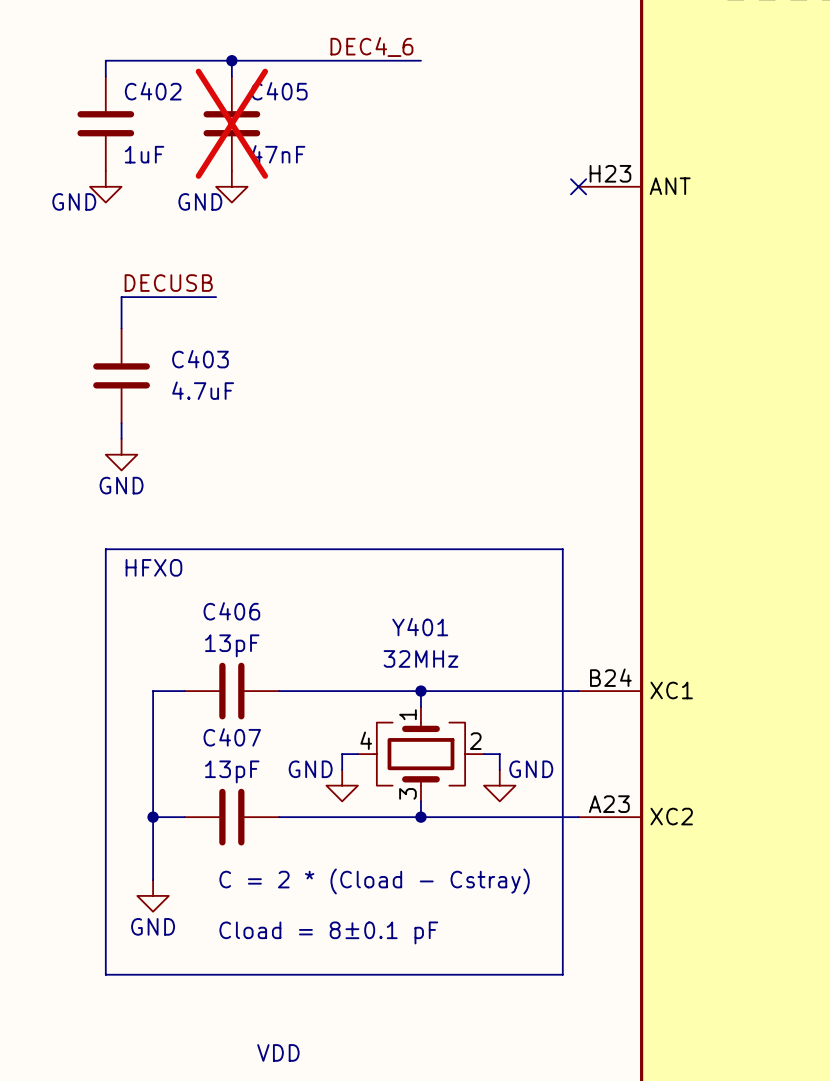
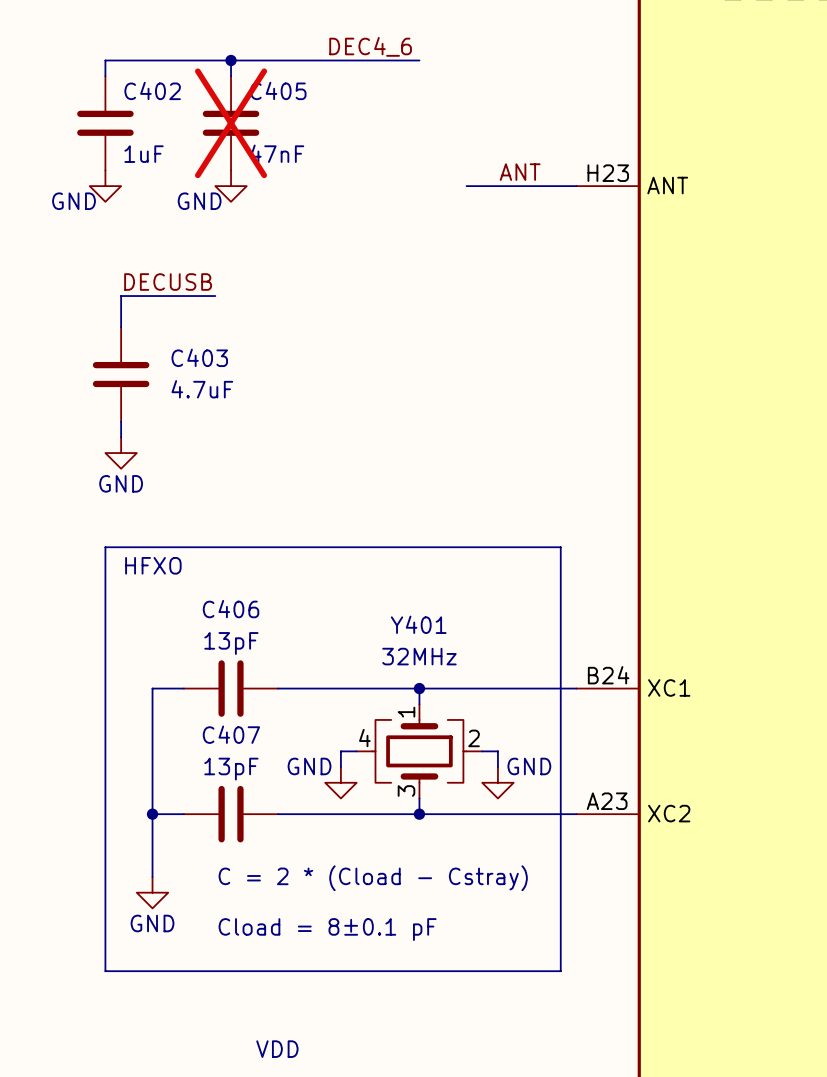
label: none -> ANT (520, 172)
wire: none -> (466, 186) (576, 186)
no-connect mark: (578, 186) -> none

